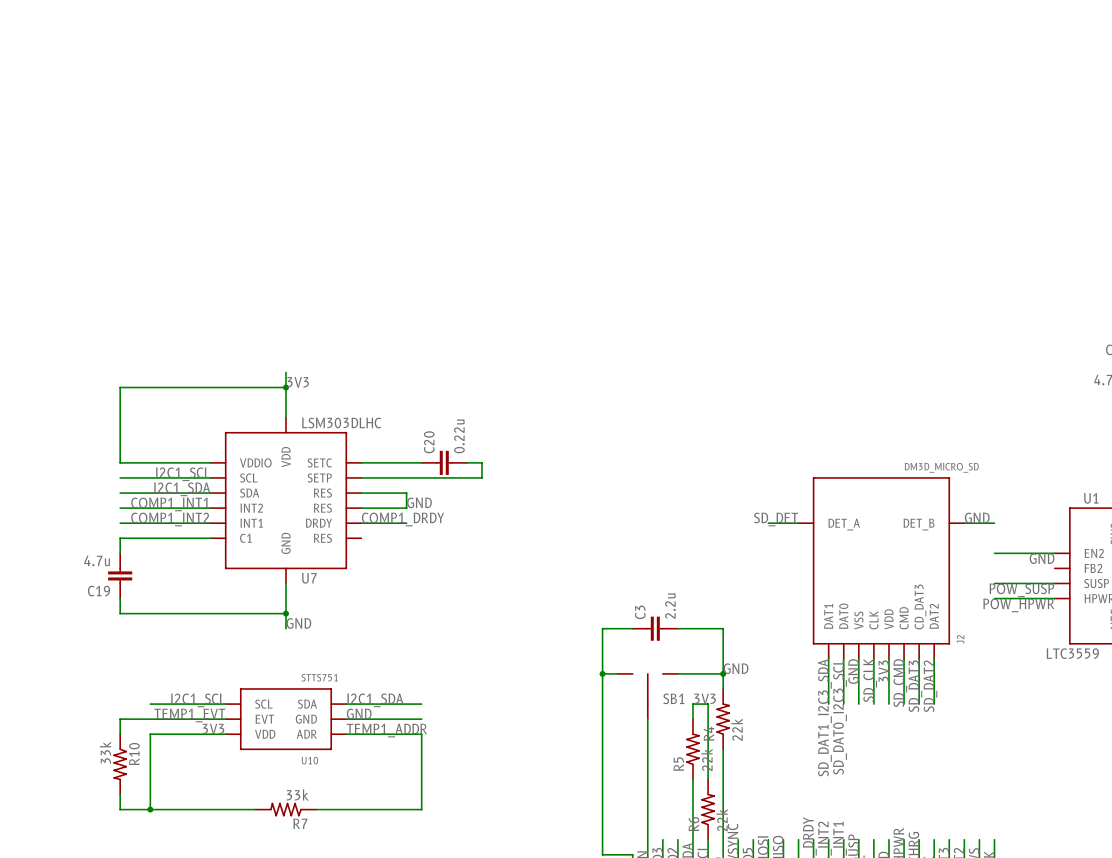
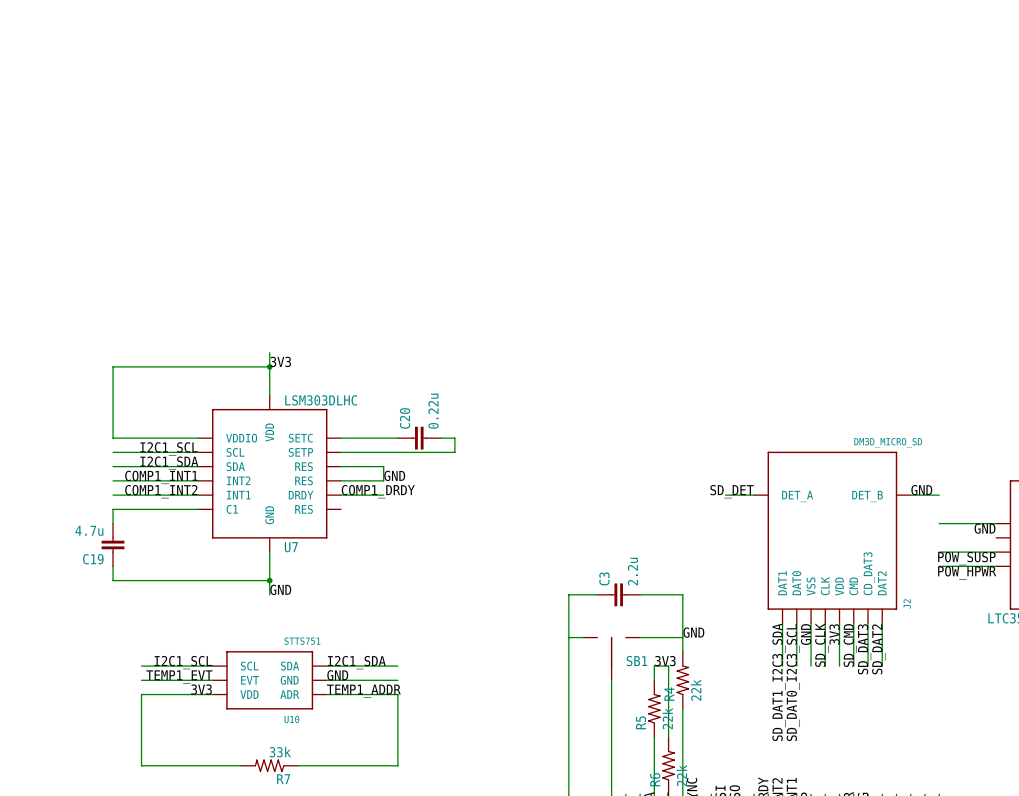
junction: (602, 673) -> none
junction: (723, 673) -> none
wire: (150, 719) (120, 719) (120, 734) -> none
R10: 33k (120, 764) -> none
wire: (120, 794) (120, 809) (150, 809) -> none
junction: (150, 809) -> none

